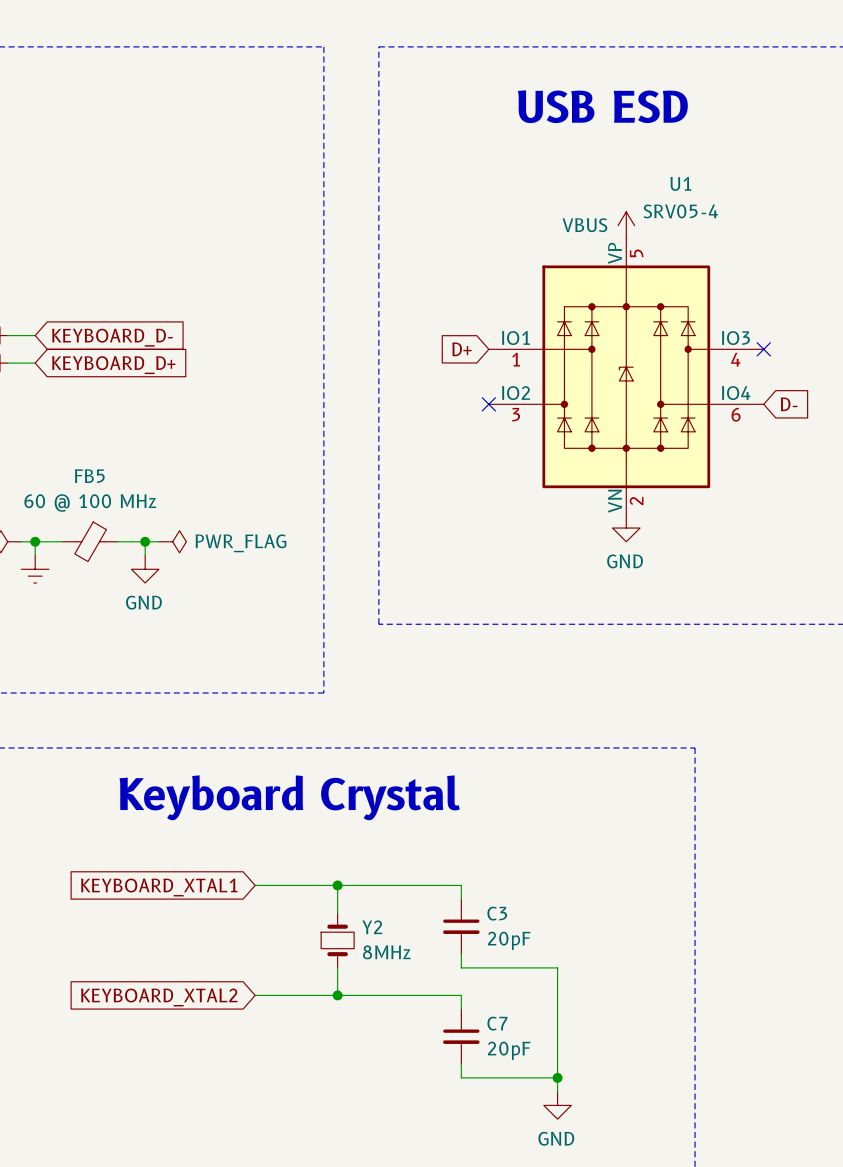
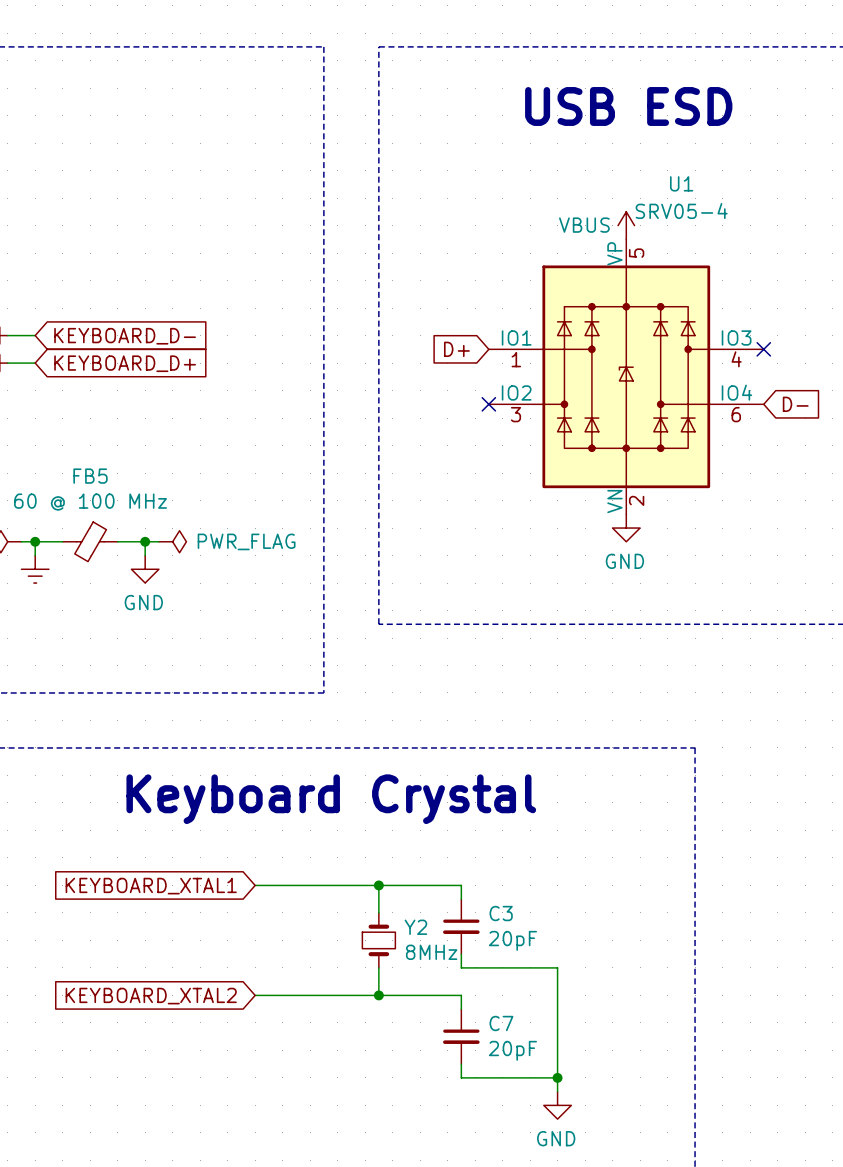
wire: (337, 885) (337, 912) -> (378, 885) (378, 912)
junction position: (337, 885) -> (378, 885)
Y2 position: (337, 940) -> (378, 940)
wire: (337, 967) (337, 995) -> (378, 967) (378, 995)
junction position: (337, 995) -> (378, 995)

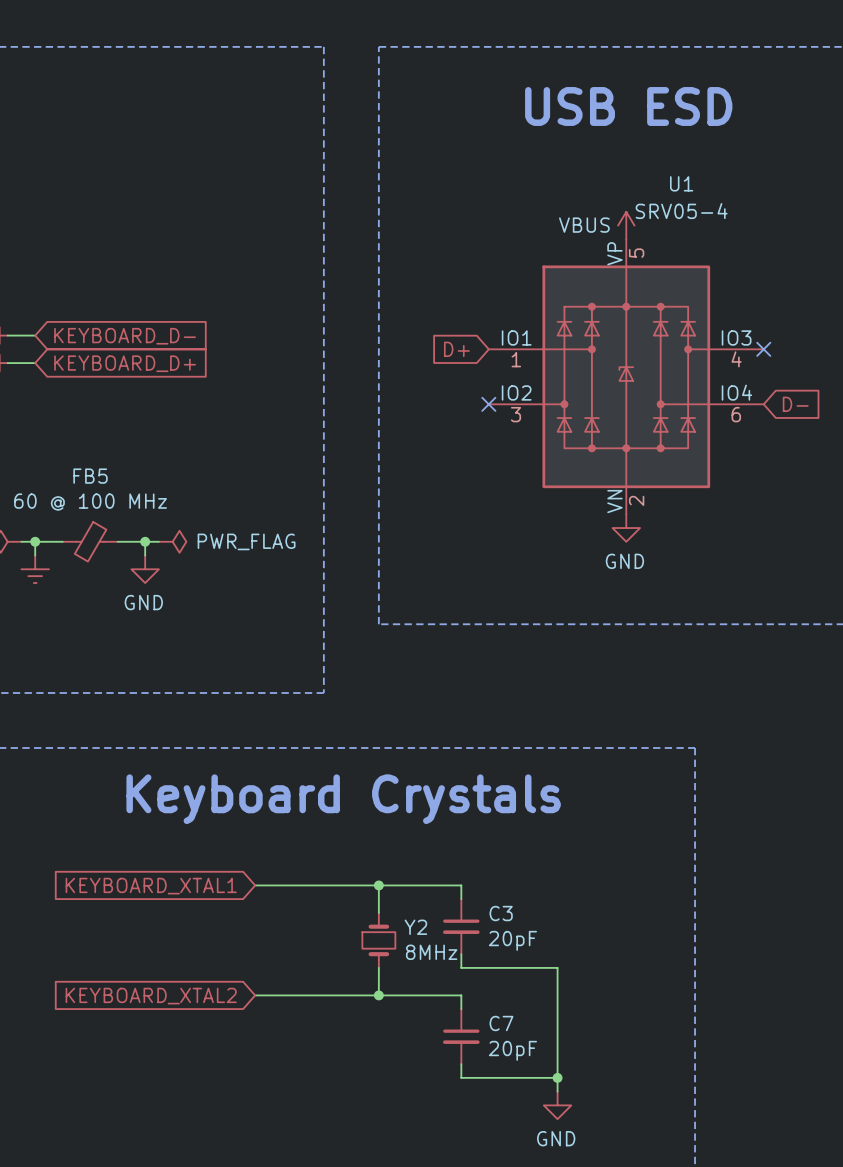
text: Keyboard Crystal (331, 799) -> Keyboard Crystals (343, 799)

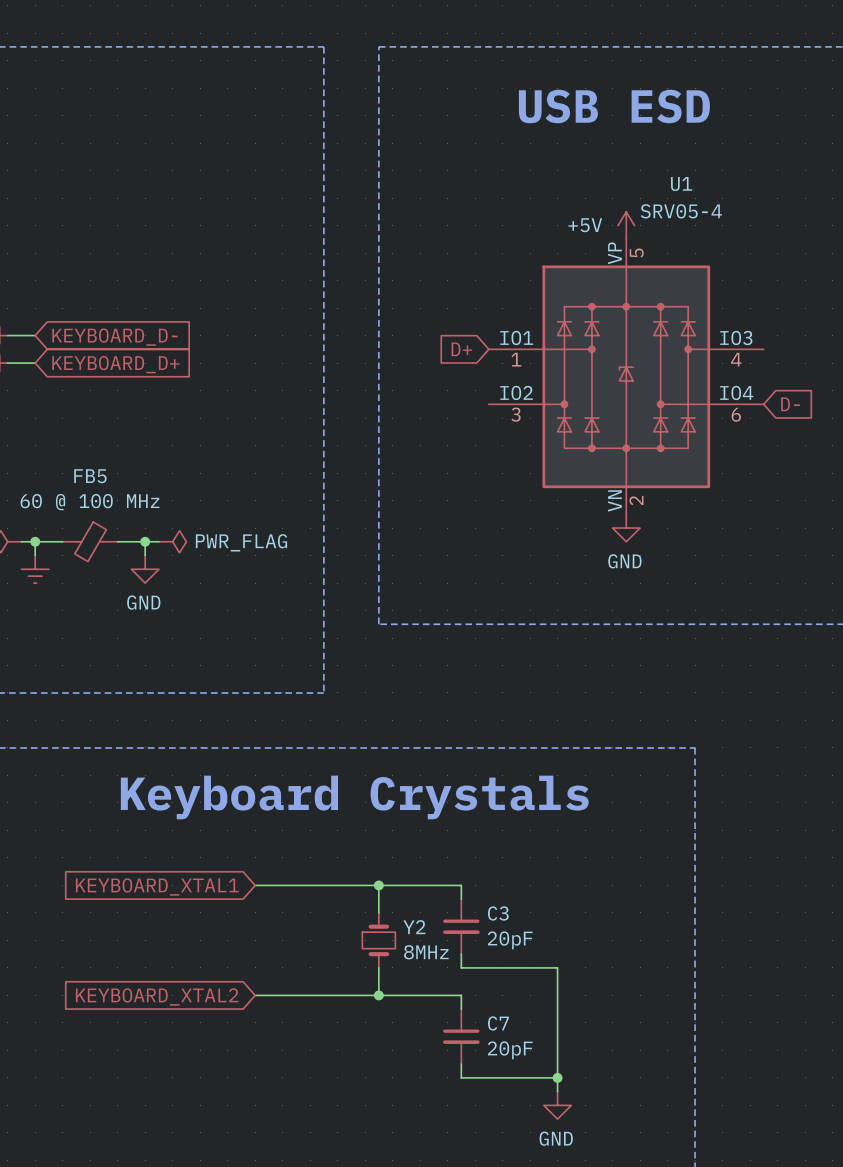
power symbol: VBUS (626, 225) -> +5V (626, 225)
no-connect mark: (763, 349) -> none
no-connect mark: (488, 404) -> none

